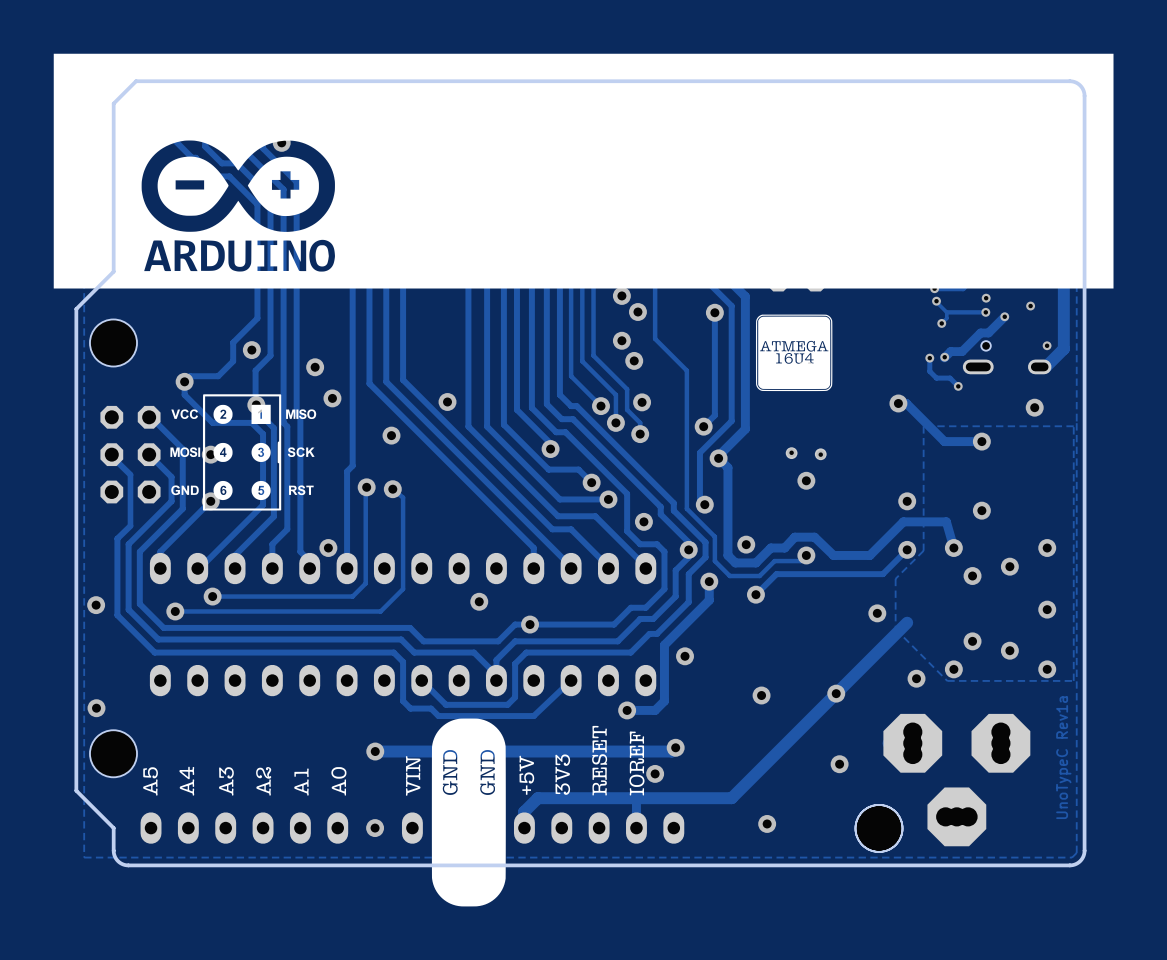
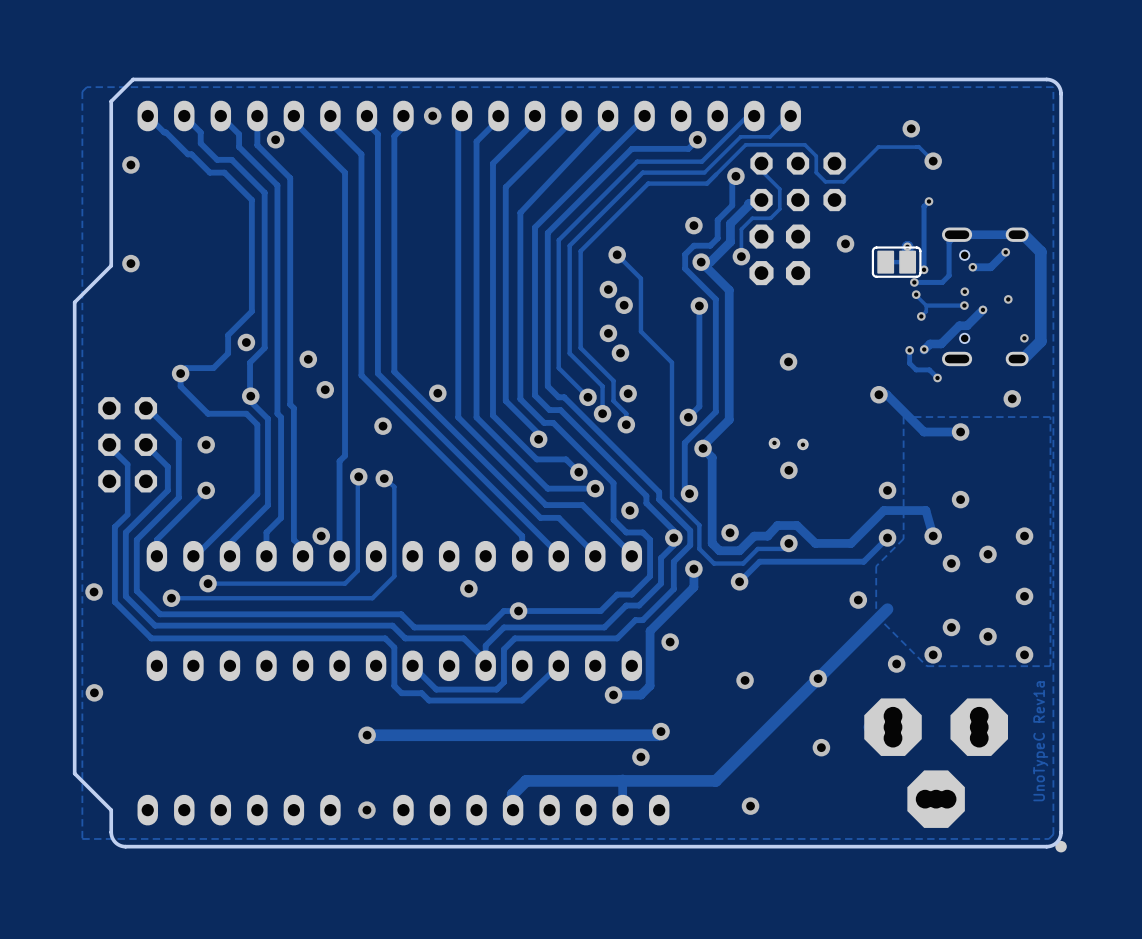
drawing: [53, 53, 1114, 907] -> none
part: (113, 343) -> none
part: (113, 753) -> none
part: (879, 828) -> none
part: none -> (1061, 846)

